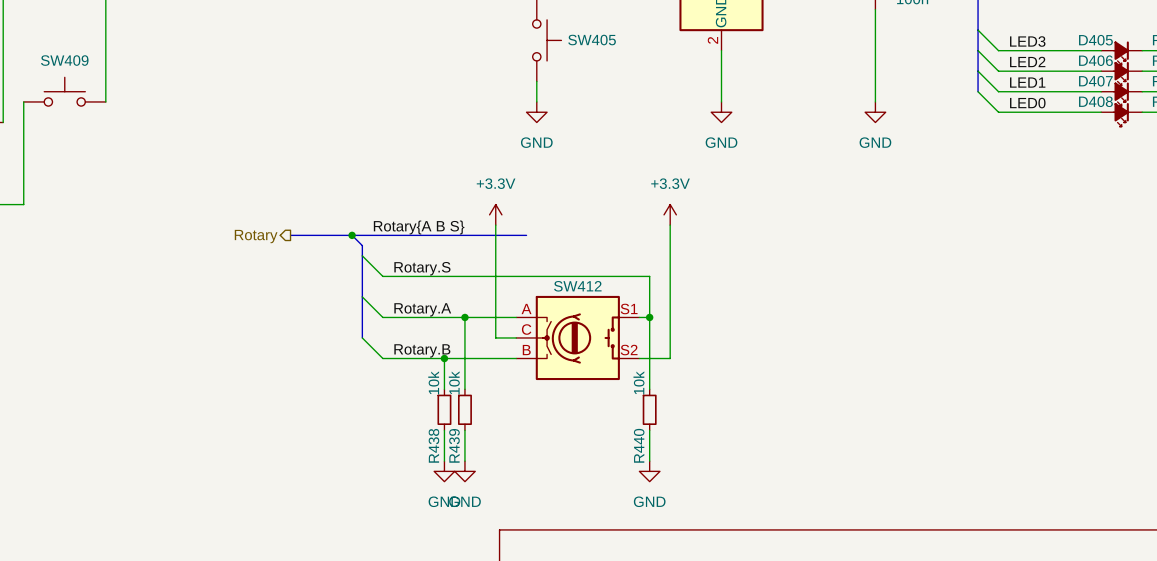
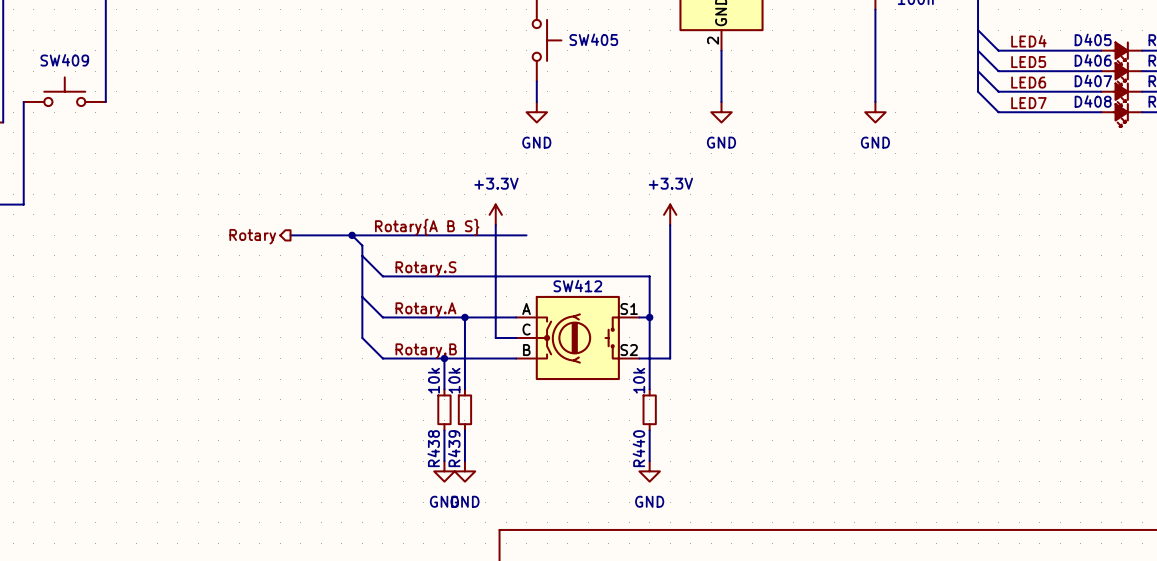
label: LED3 (1027, 41) -> LED4 (1028, 41)
label: LED2 (1027, 61) -> LED5 (1028, 62)
label: LED1 (1027, 82) -> LED6 (1028, 82)
label: LED0 (1027, 103) -> LED7 (1028, 103)

